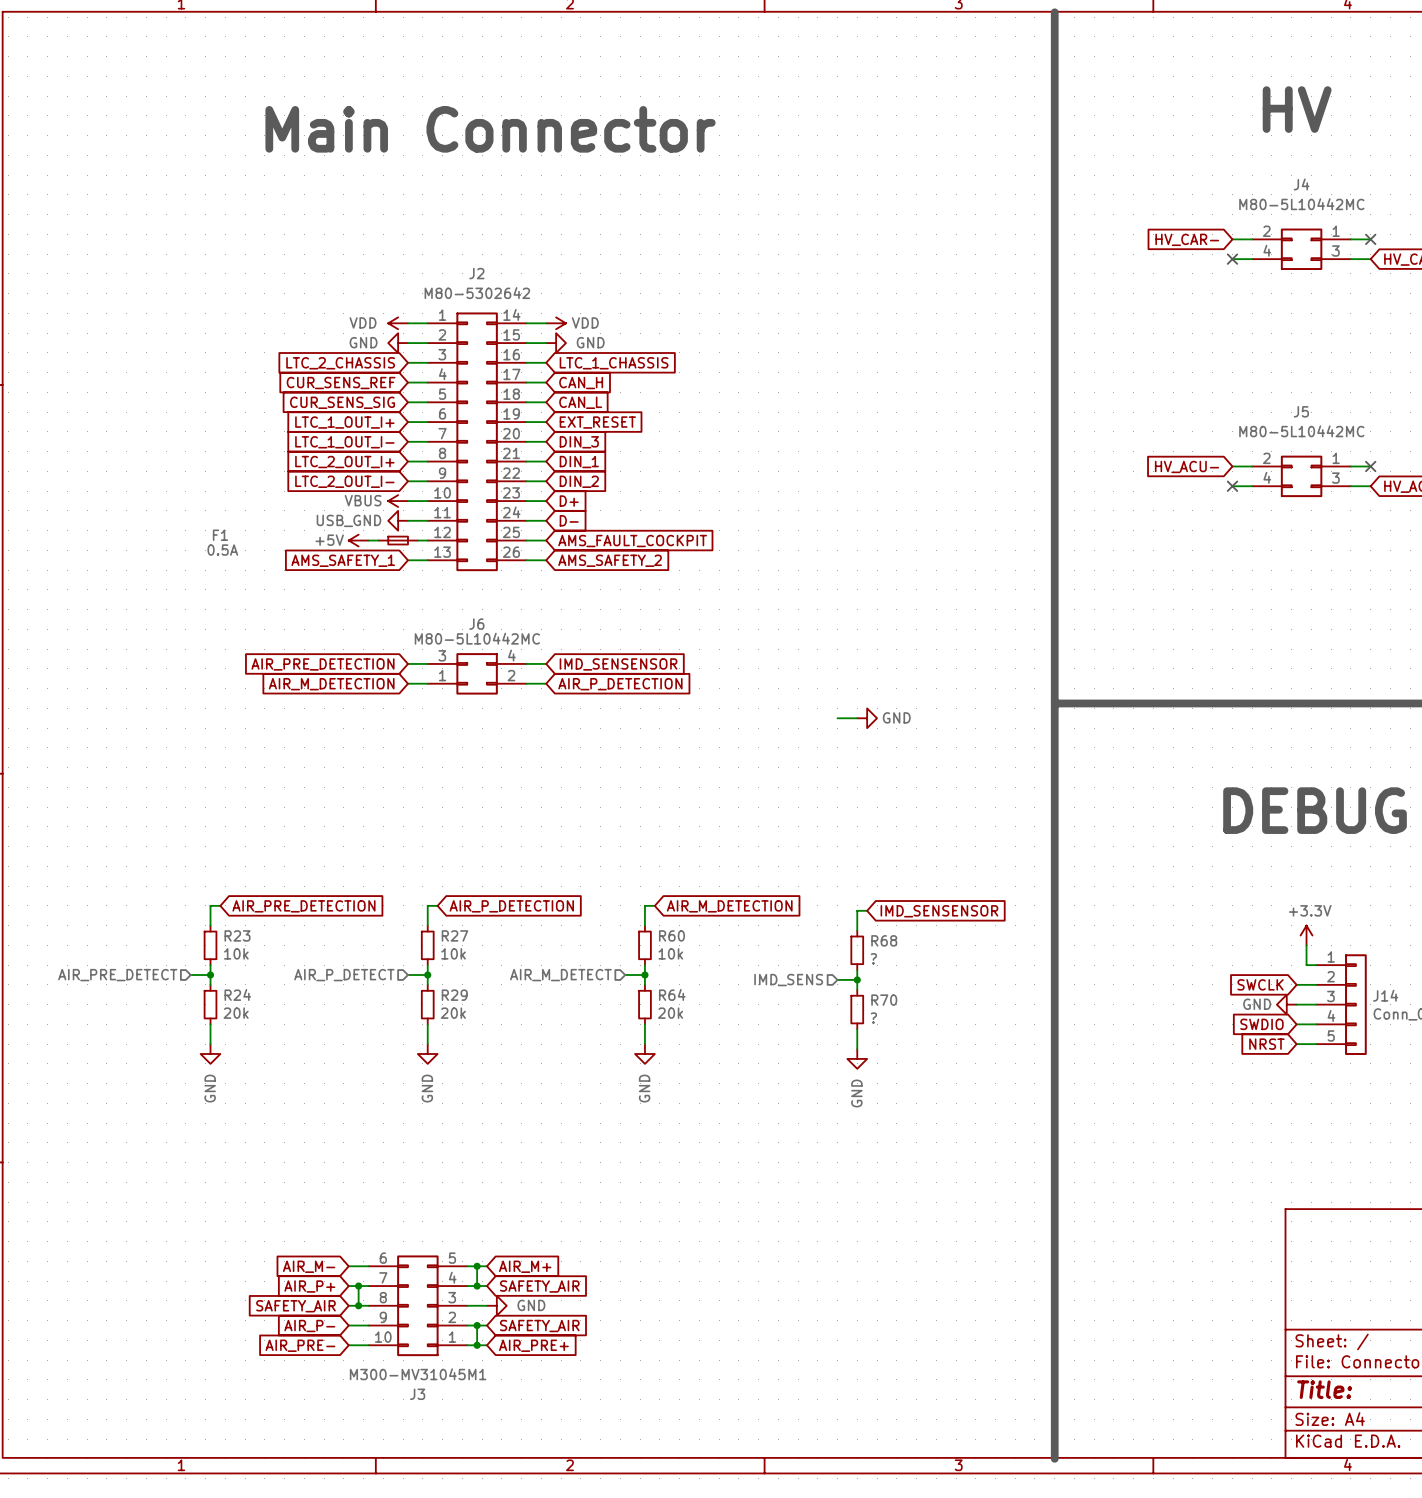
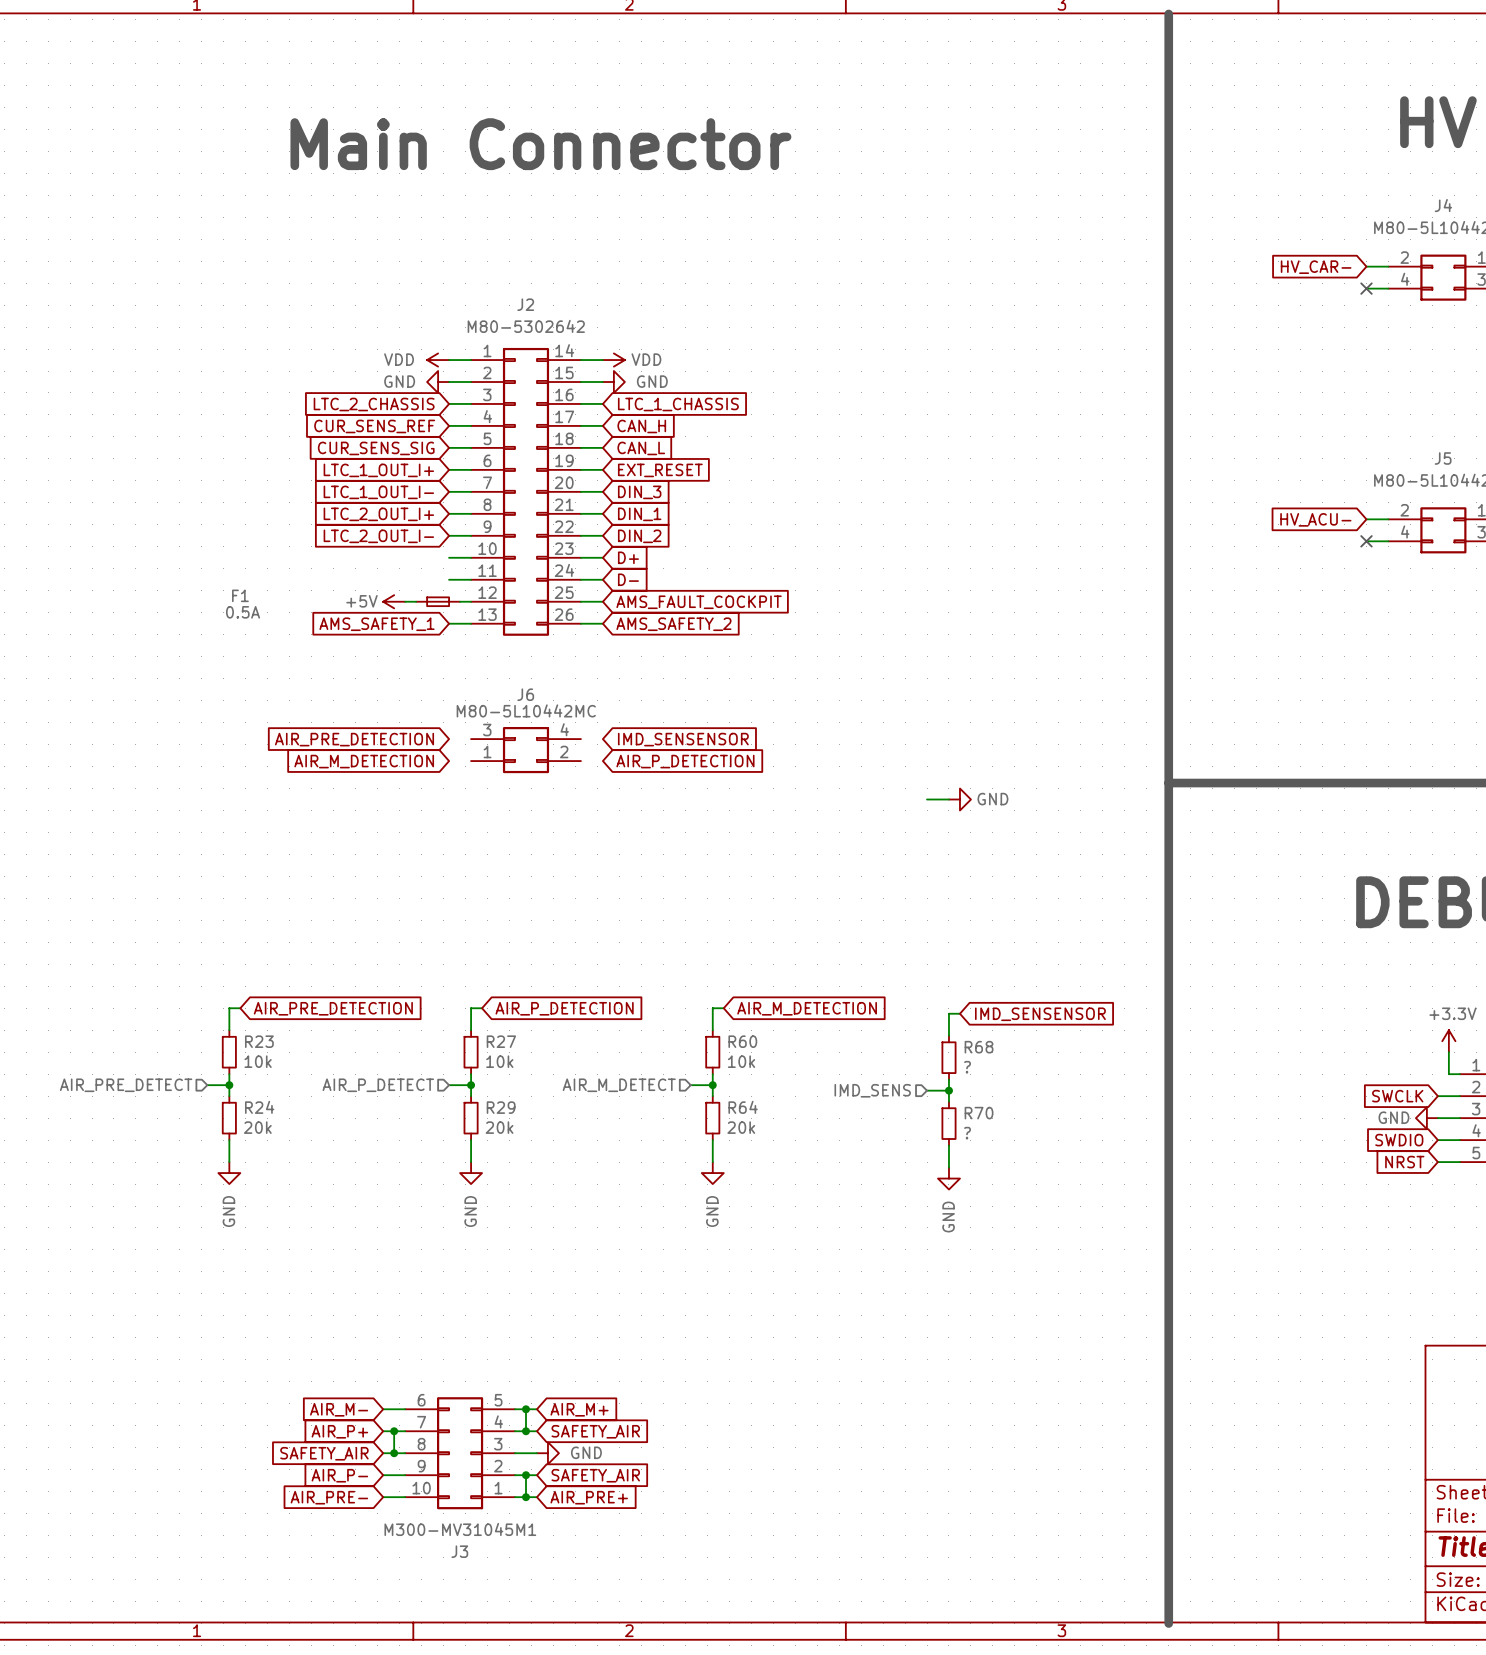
power symbol: VBUS (398, 501) -> none
power symbol: USB_GND (398, 520) -> none
wire: (407, 663) (427, 663) -> none
wire: (526, 663) (546, 663) -> none
wire: (407, 683) (427, 683) -> none
wire: (526, 683) (546, 683) -> none

